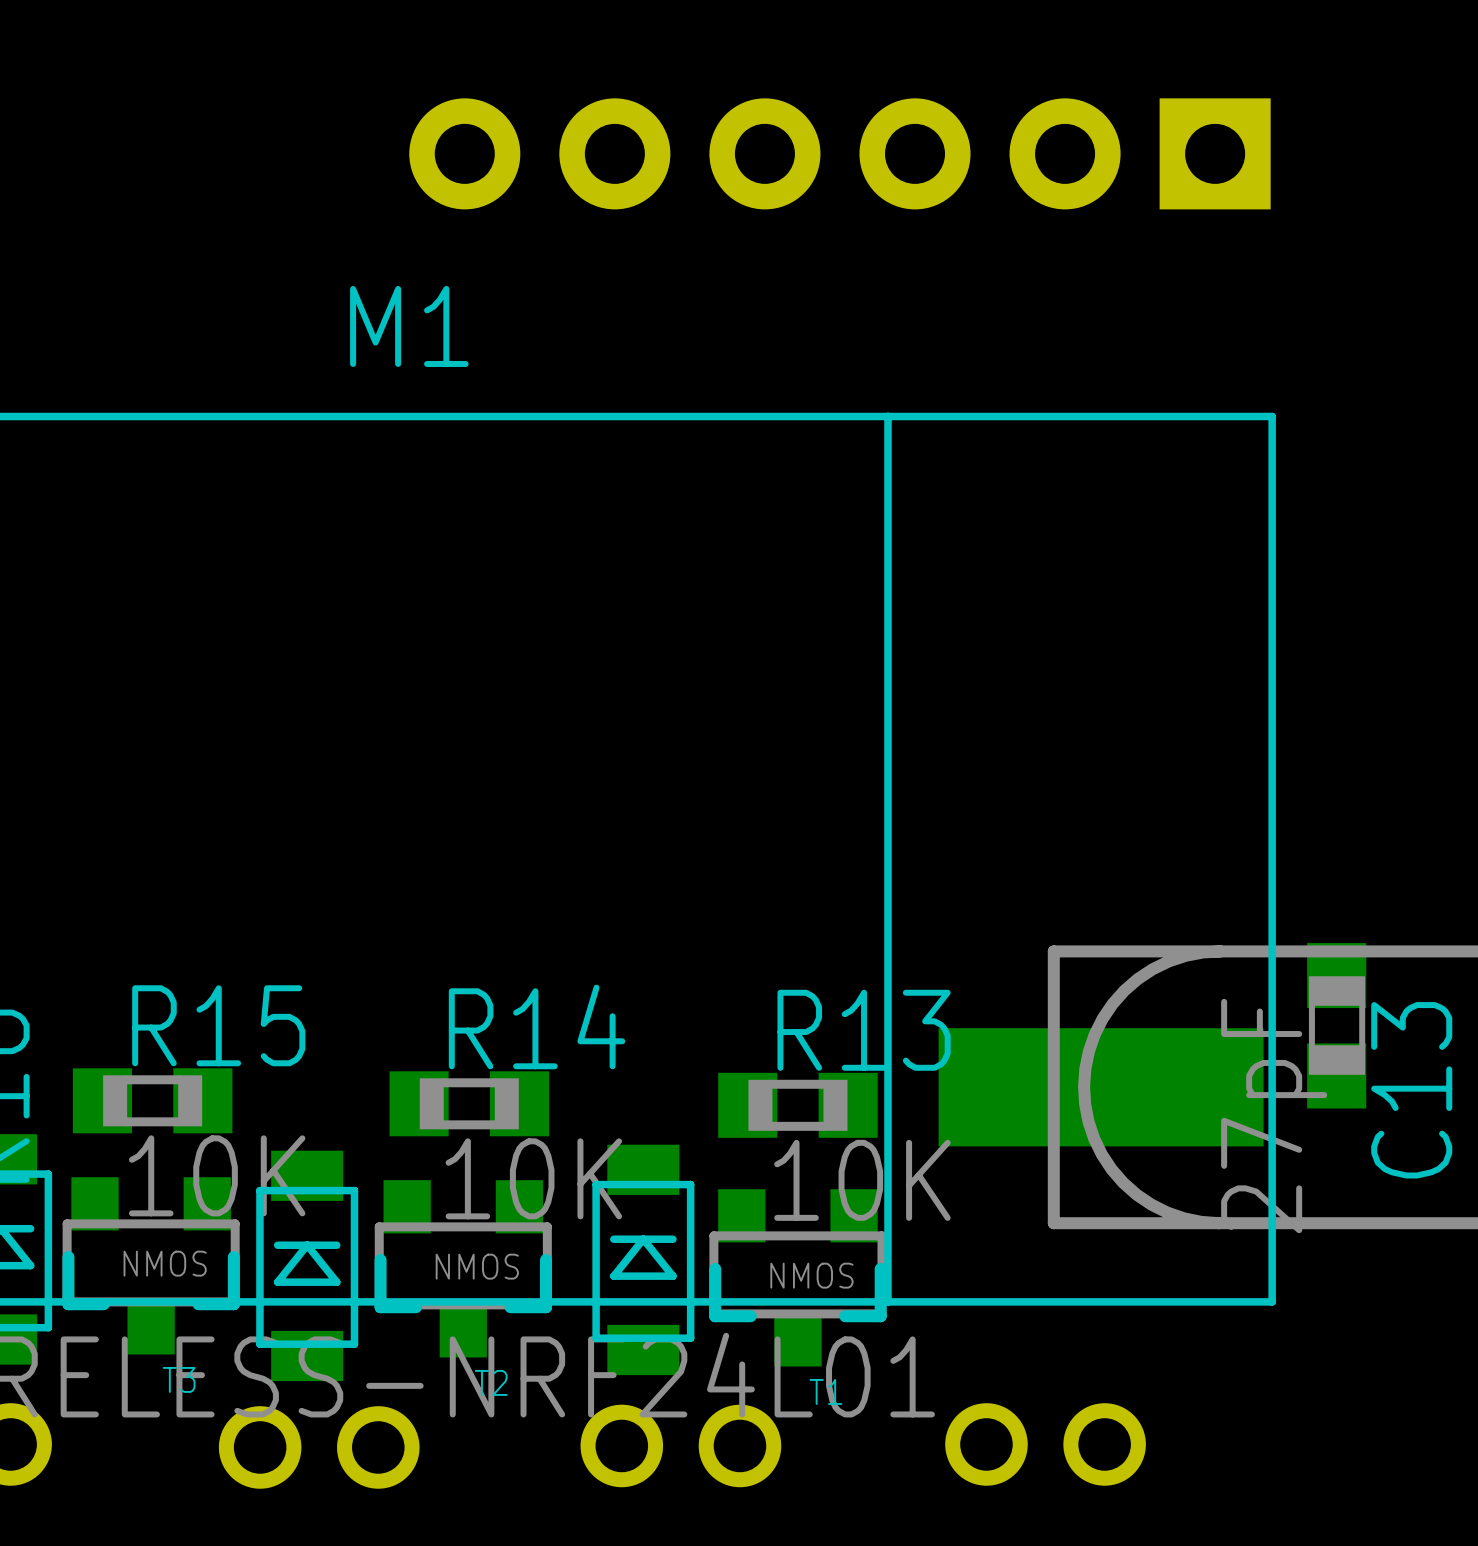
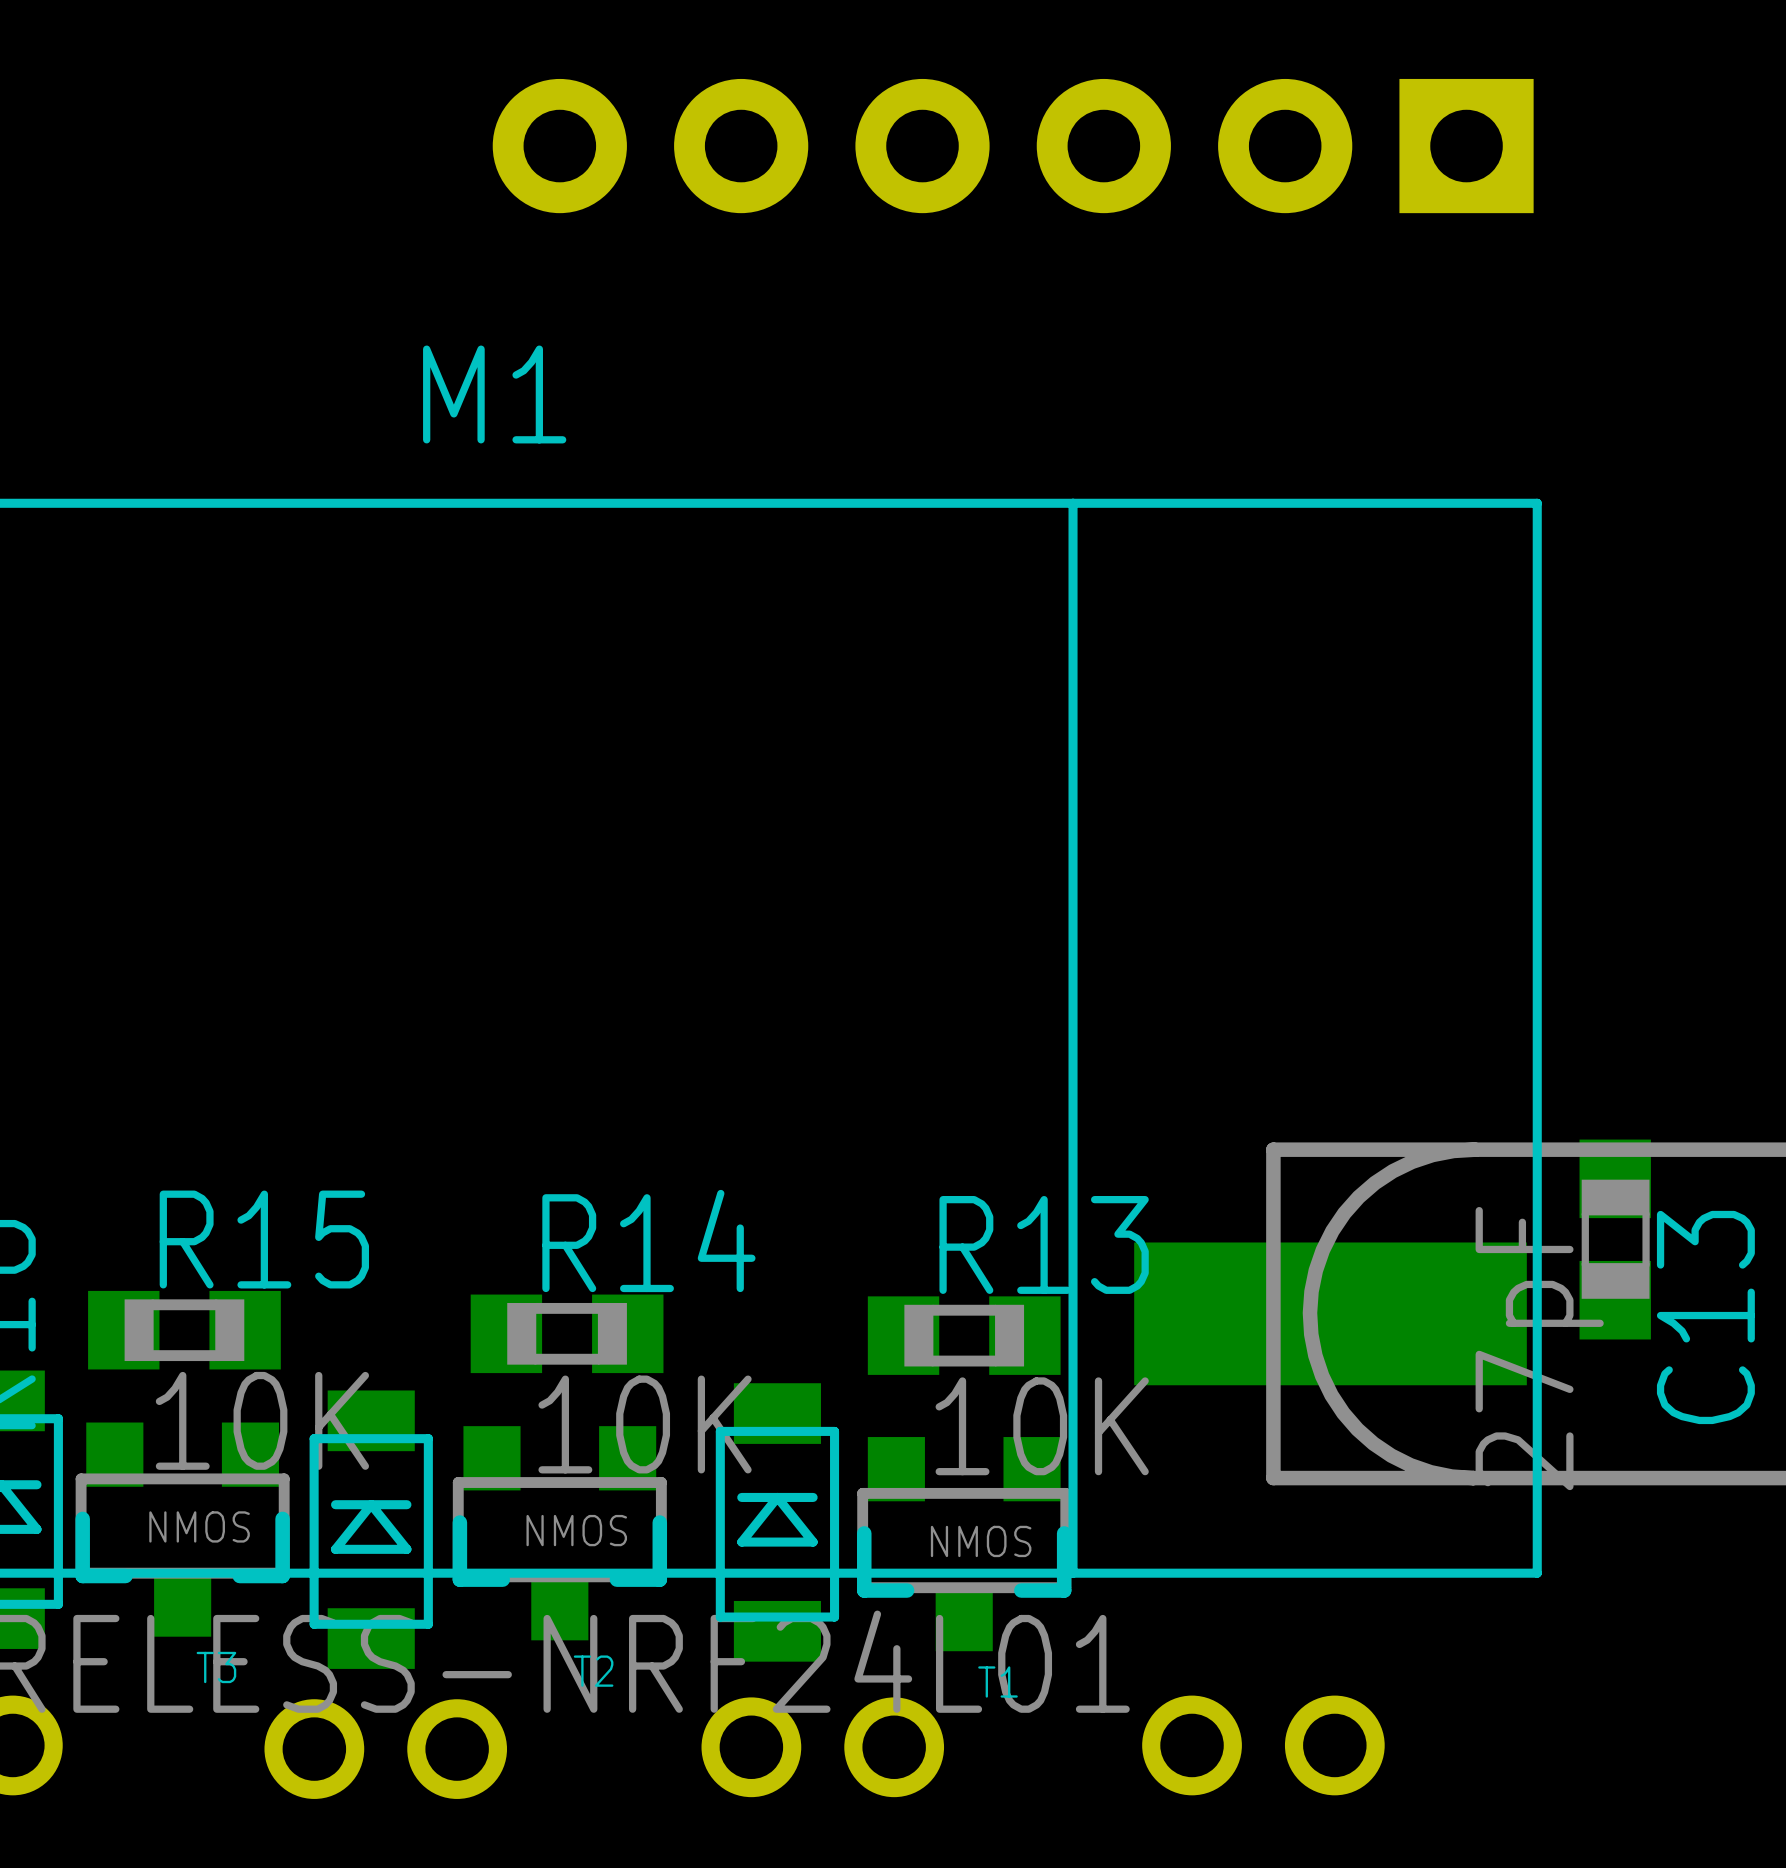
part position: (839, 153) -> (1013, 146)

